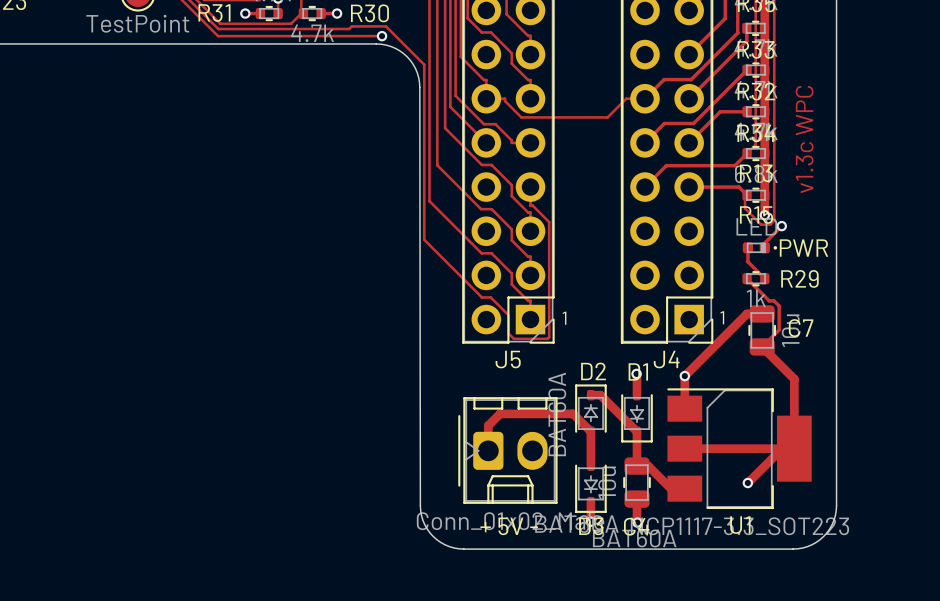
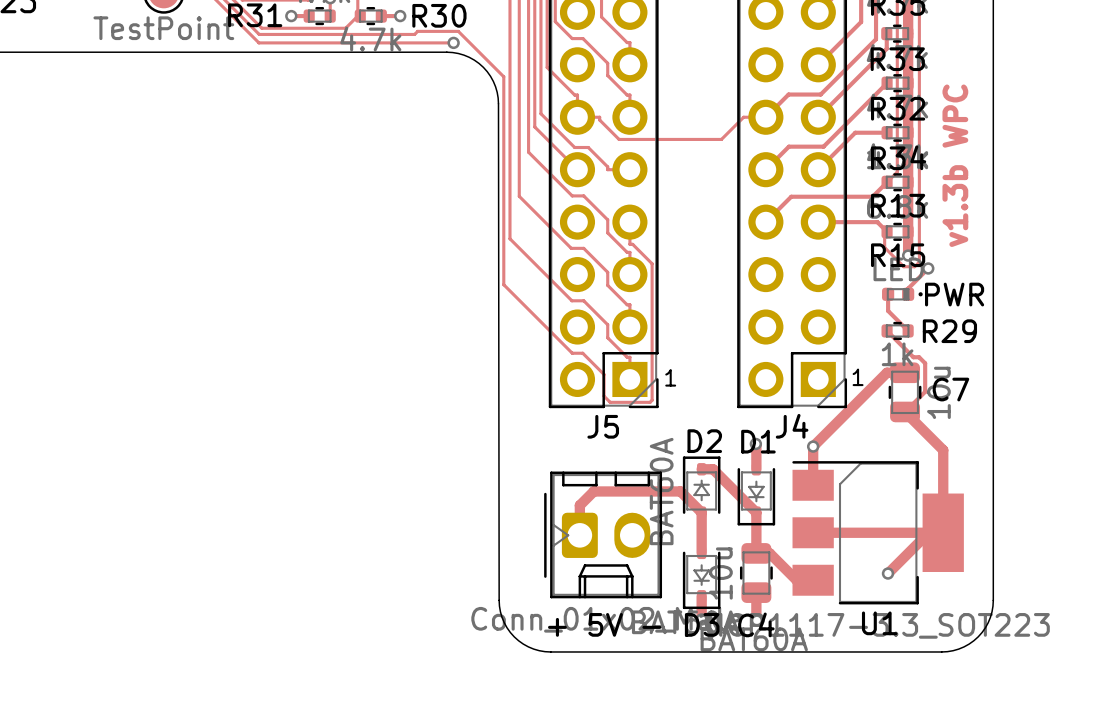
text: v1.3c WPC (804, 139) -> v1.3b WPC (955, 165)

